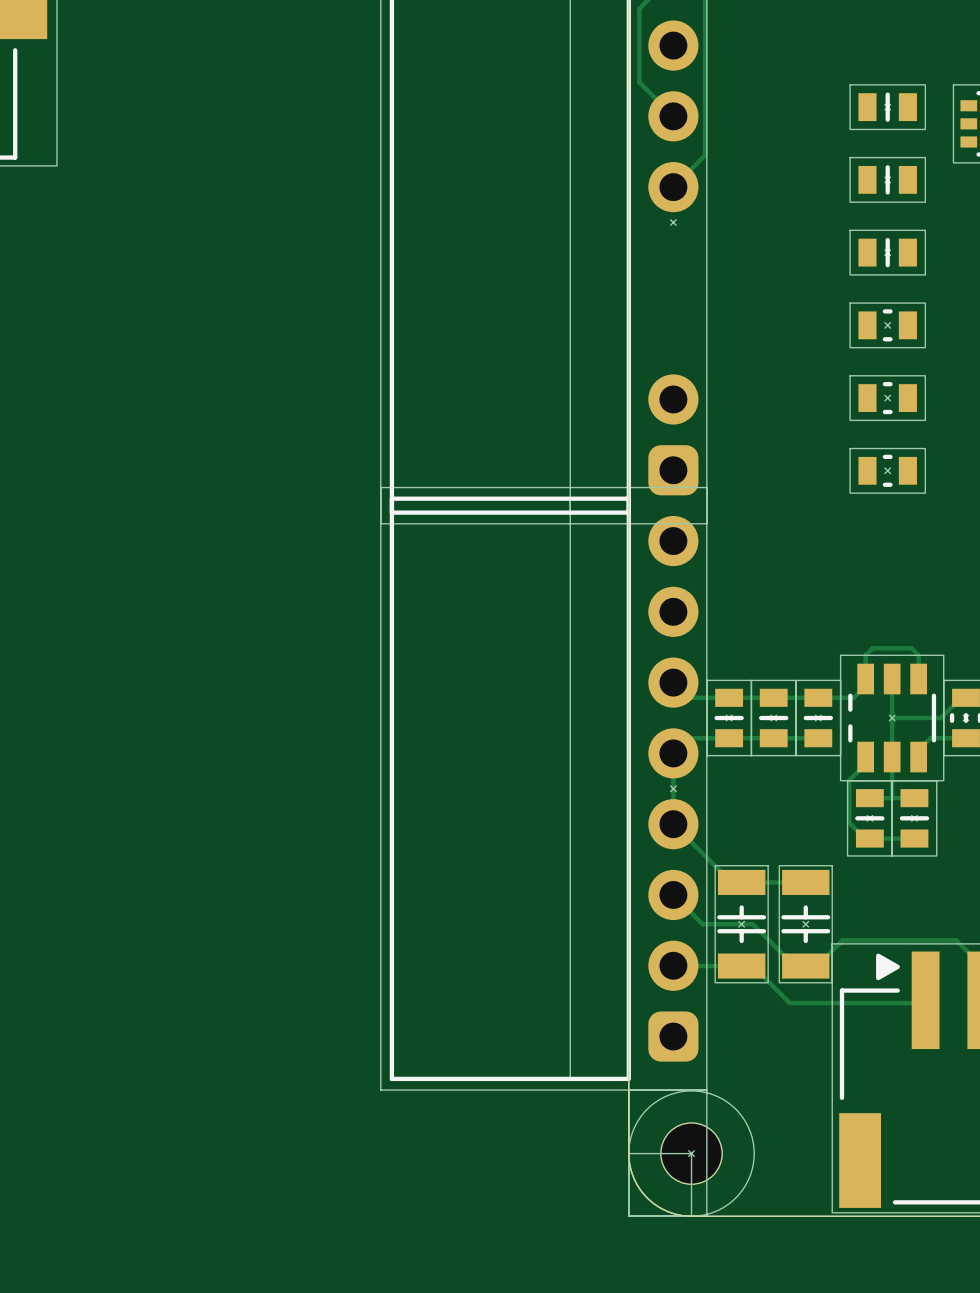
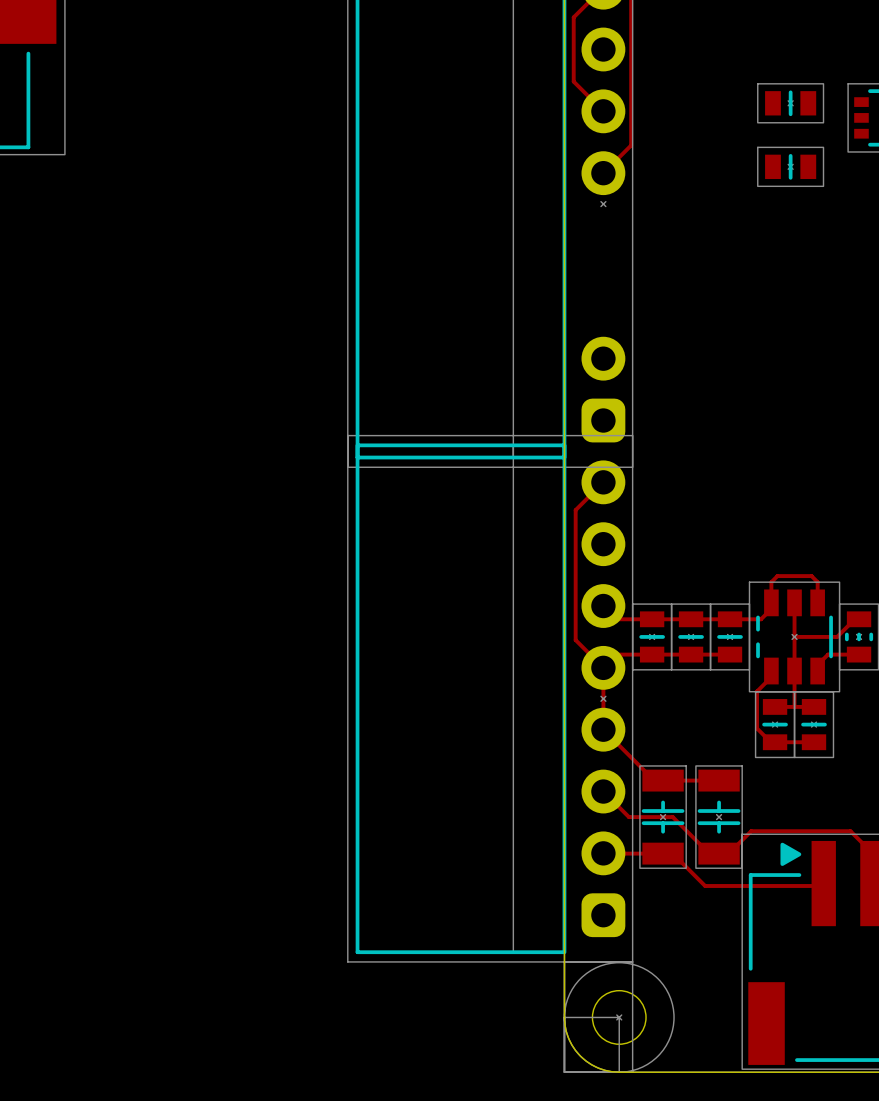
part: (887, 252) -> none
part: (887, 325) -> none
part: (887, 398) -> none
part: (887, 470) -> none
track: none -> (603, 482) (575, 510) (575, 640) (603, 667)

